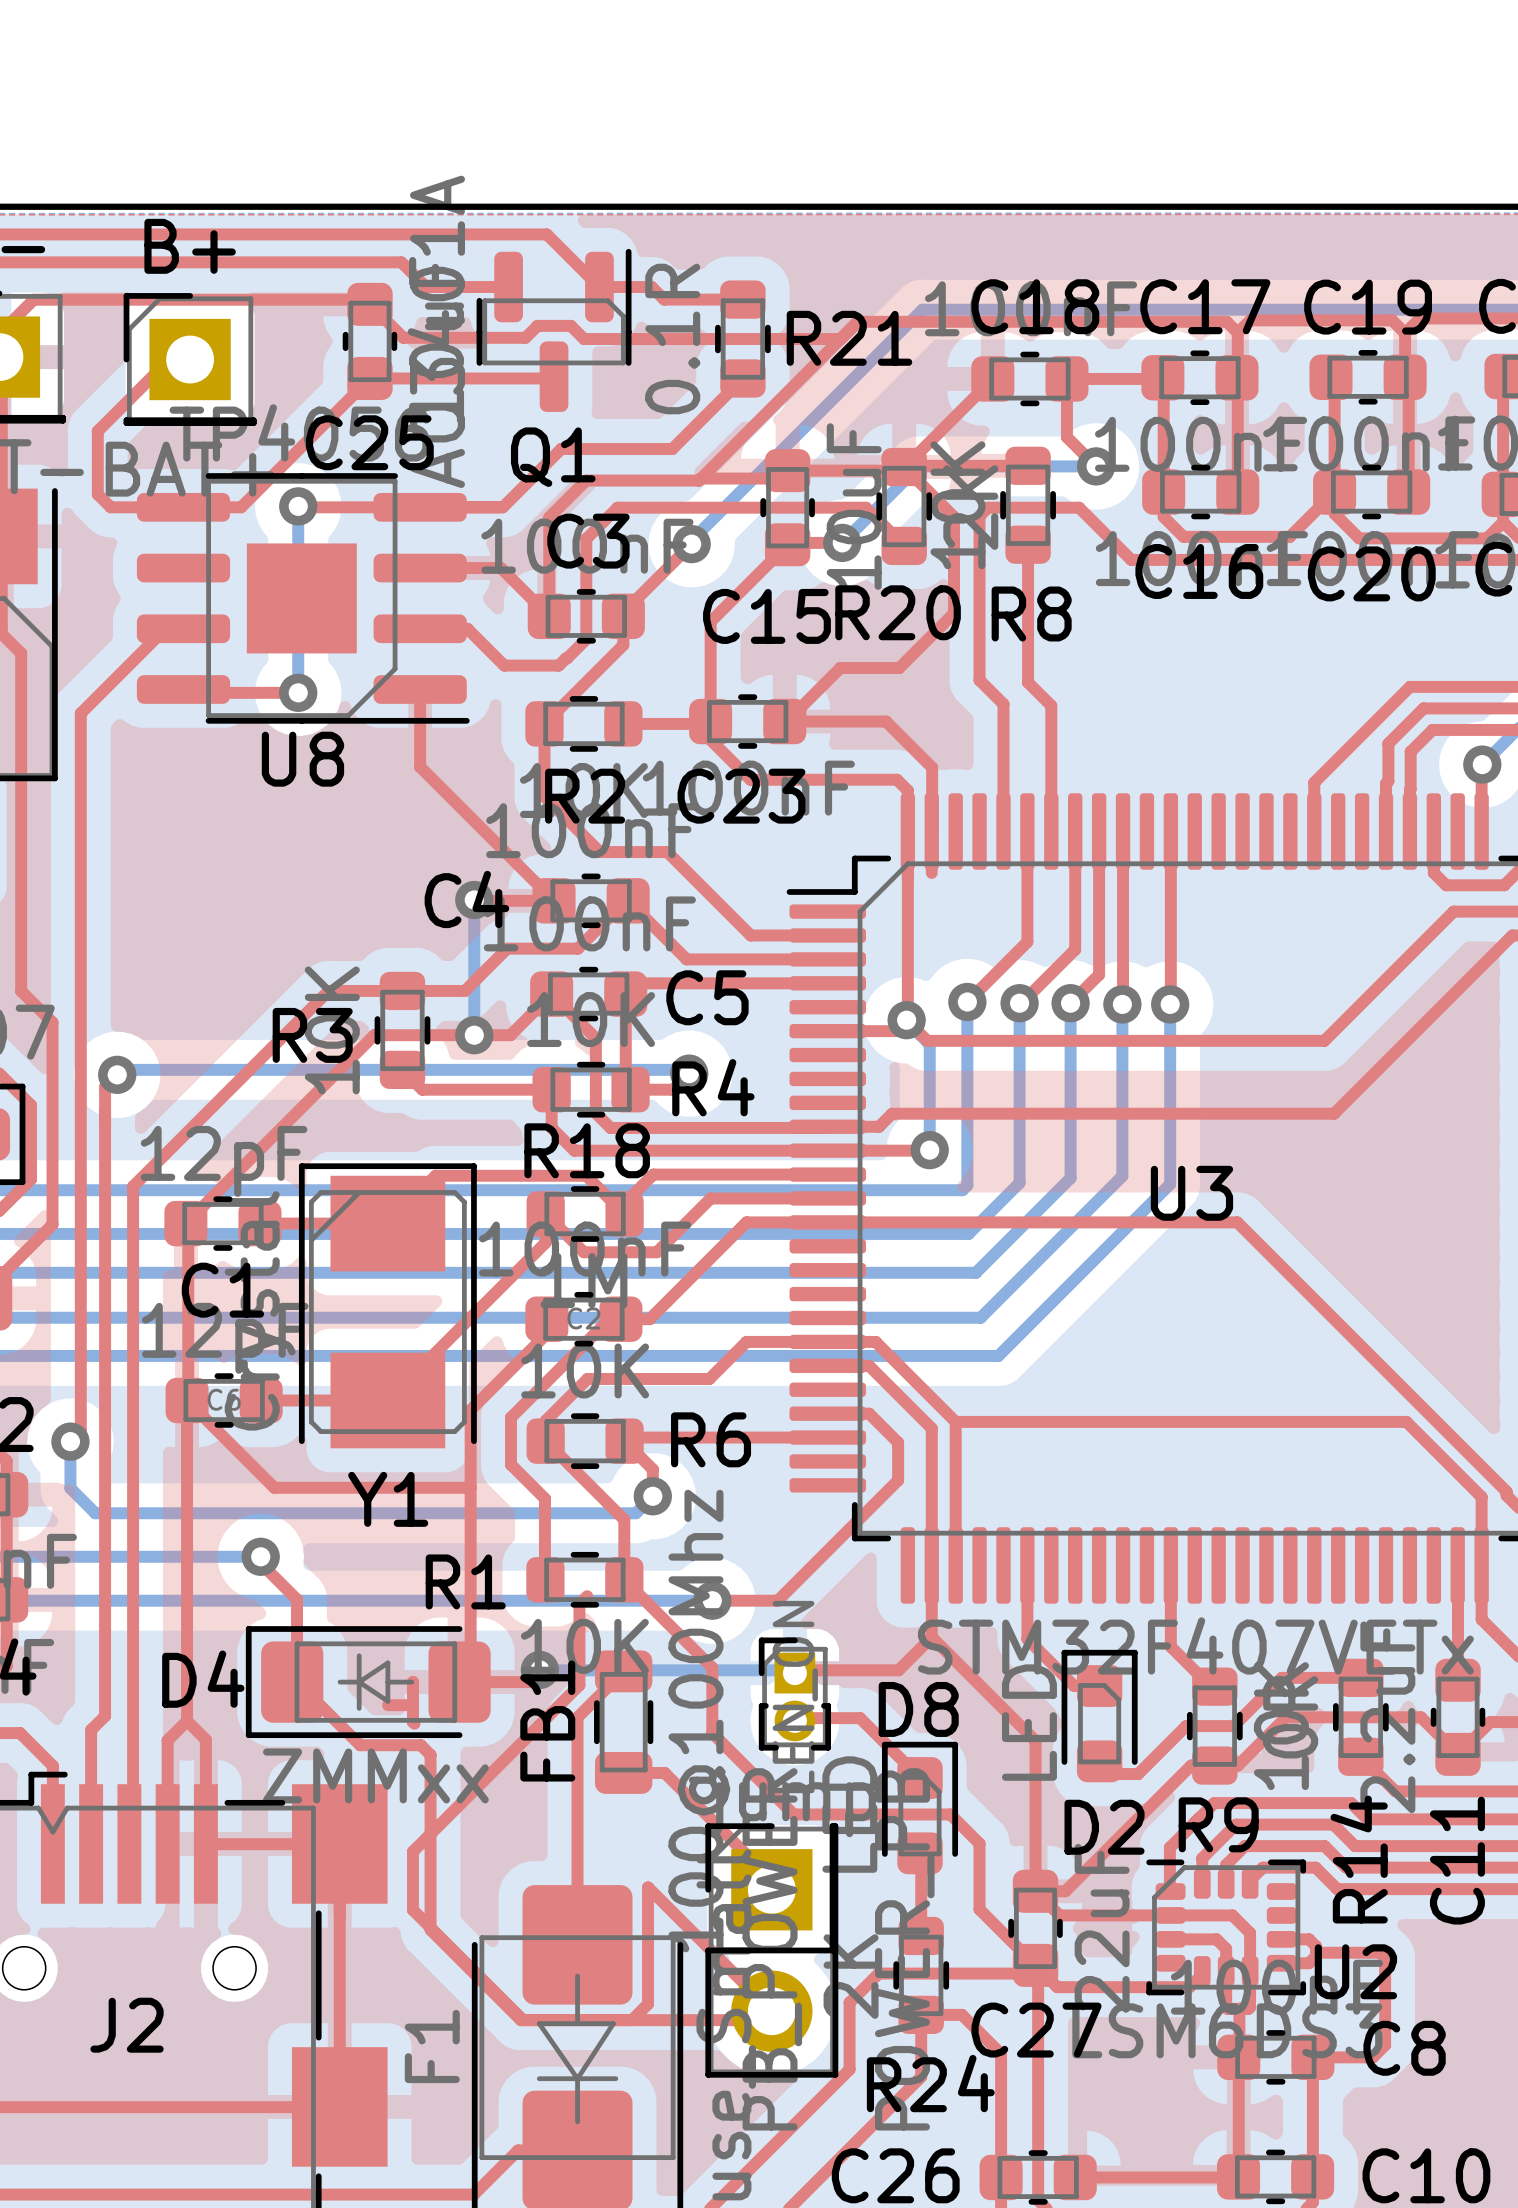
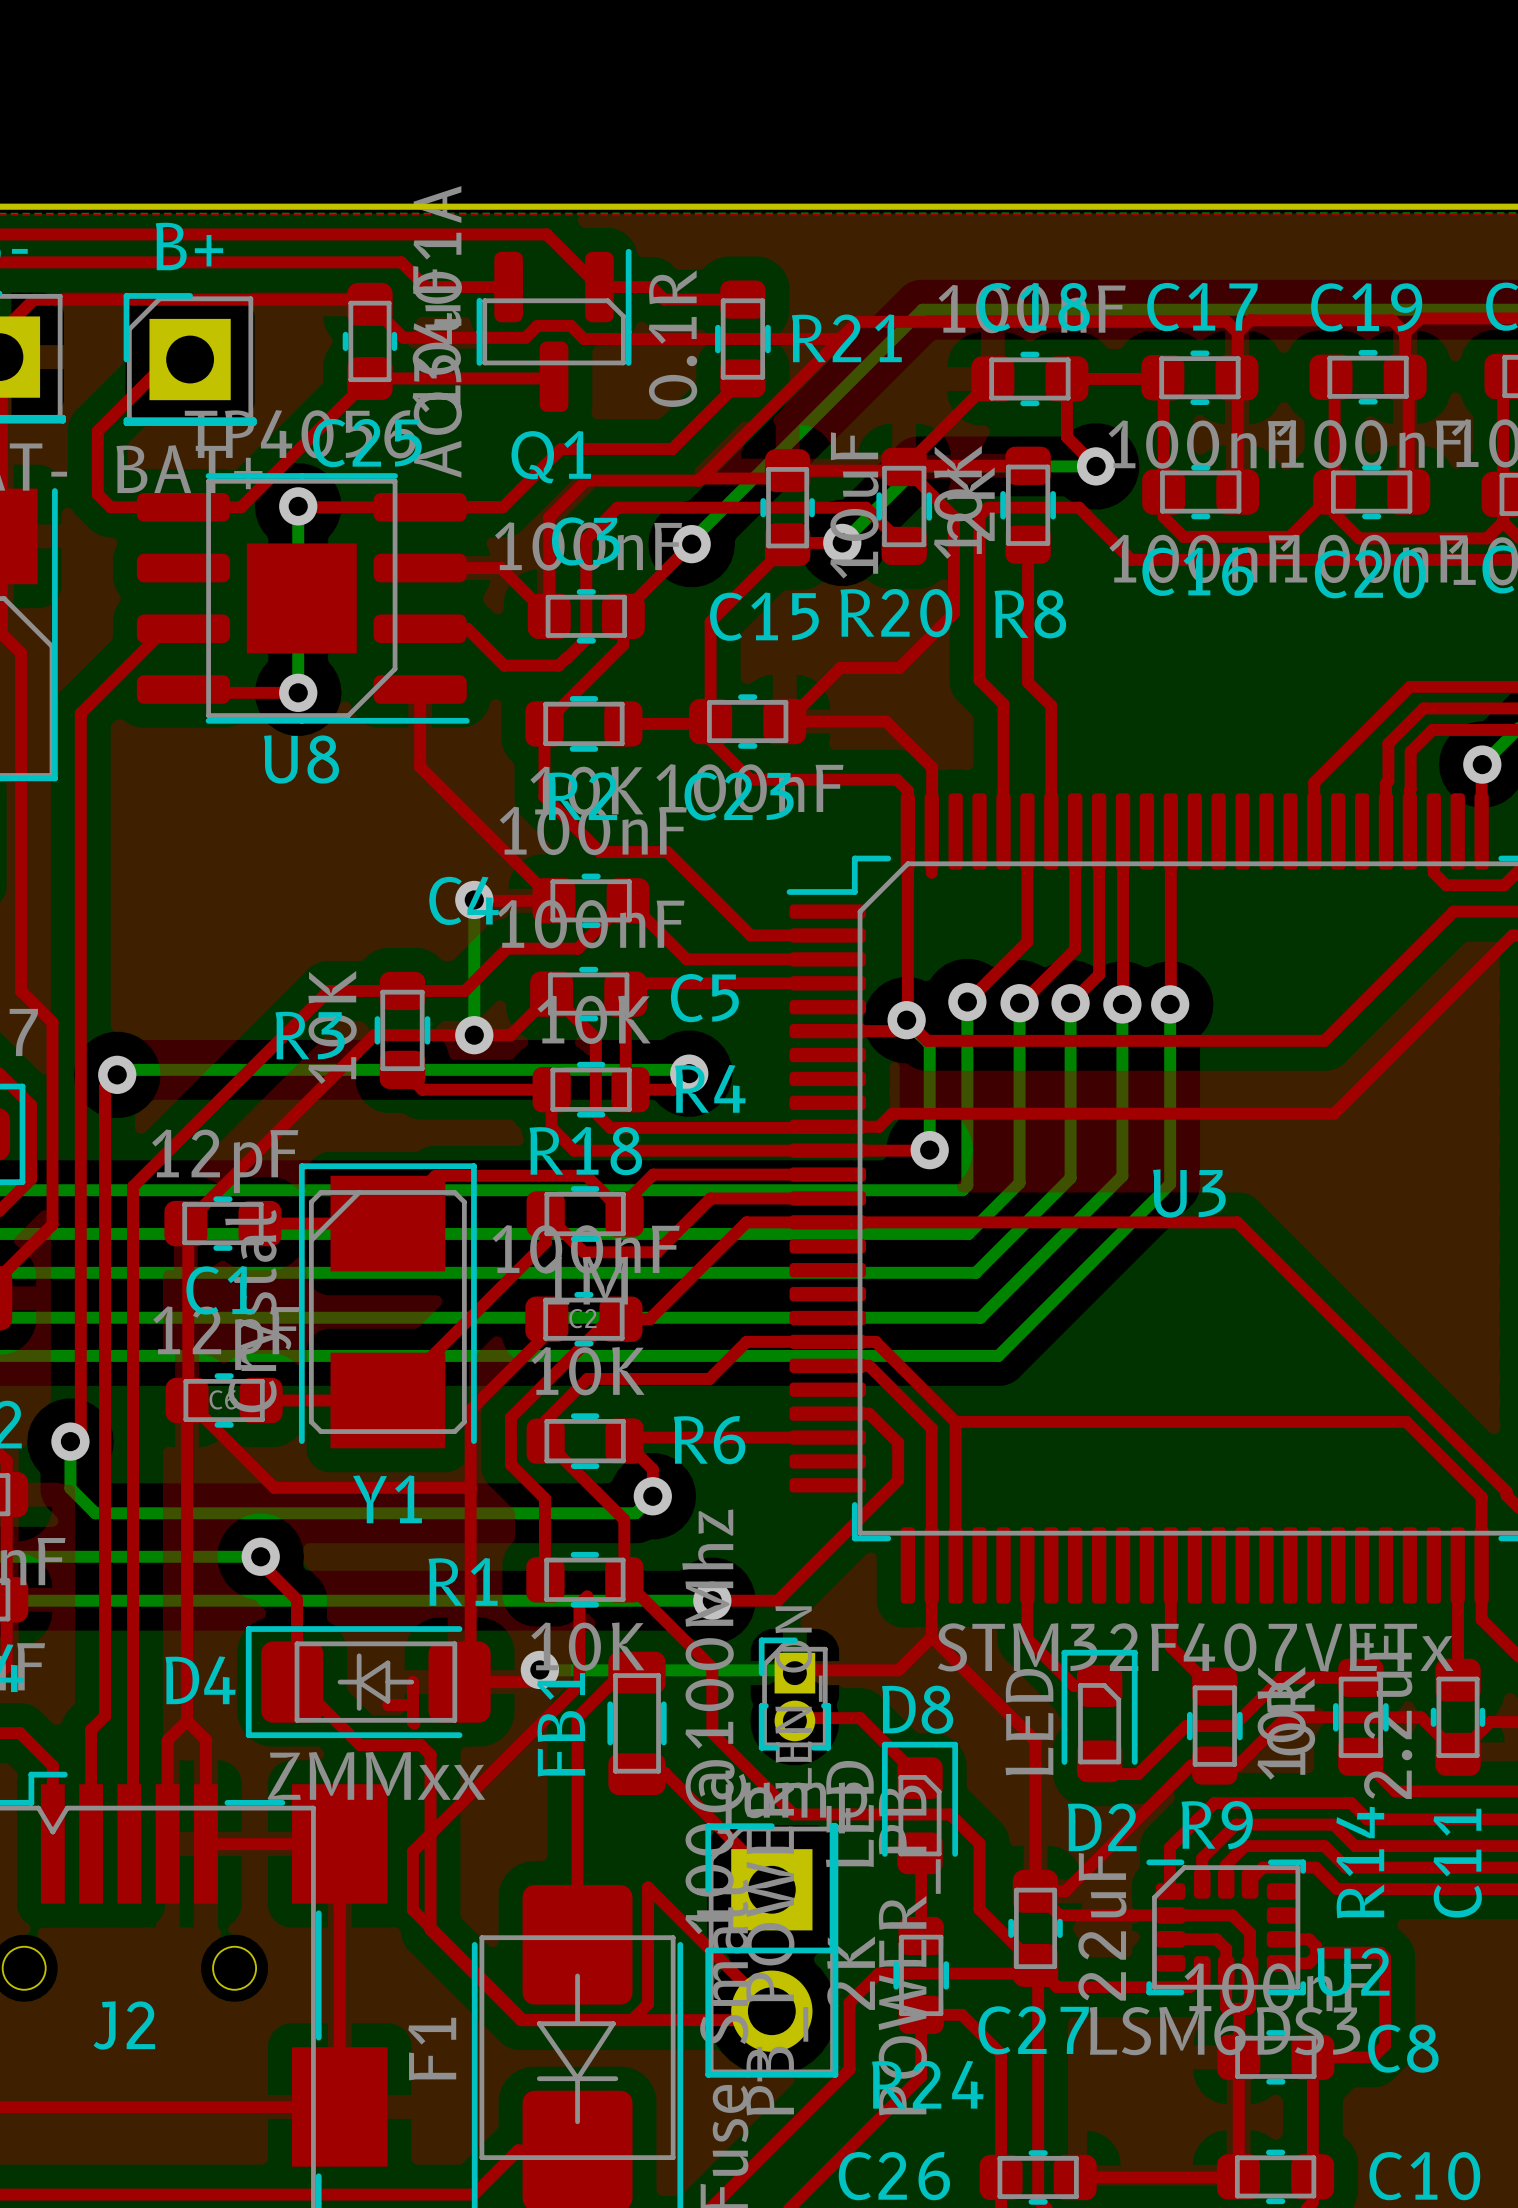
FB1 position: (623, 1722) -> (637, 1723)

